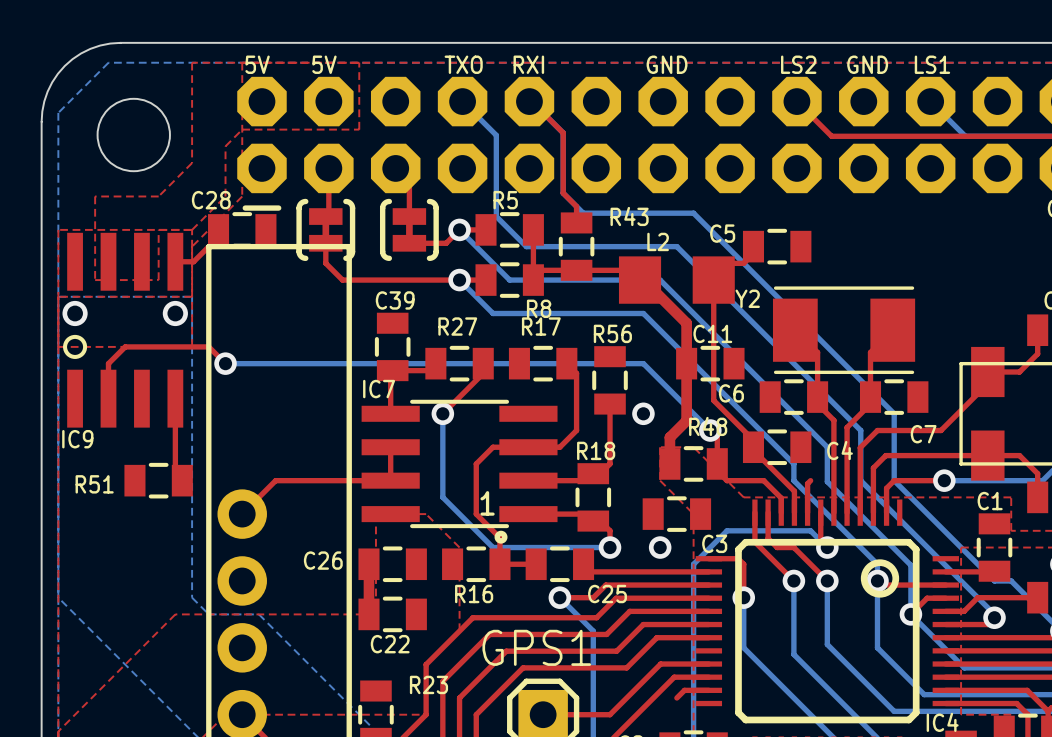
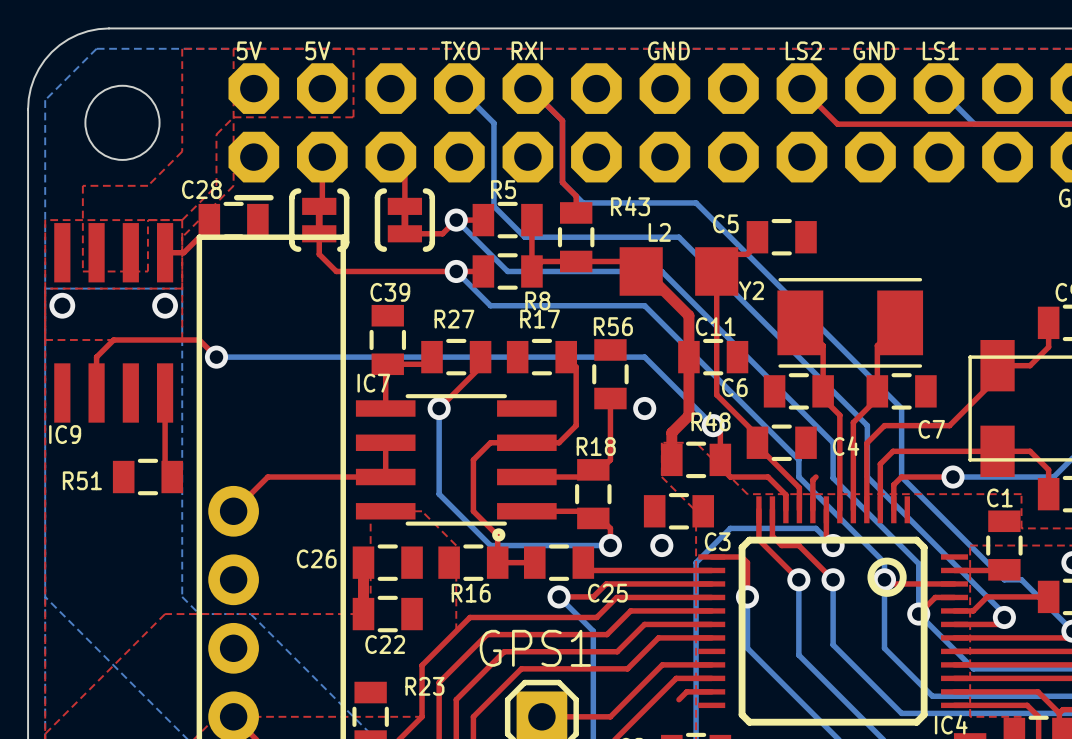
IC9 footprint: [63, 232, 184, 428] -> [54, 223, 174, 423]
text: 1 (487, 503) -> none

